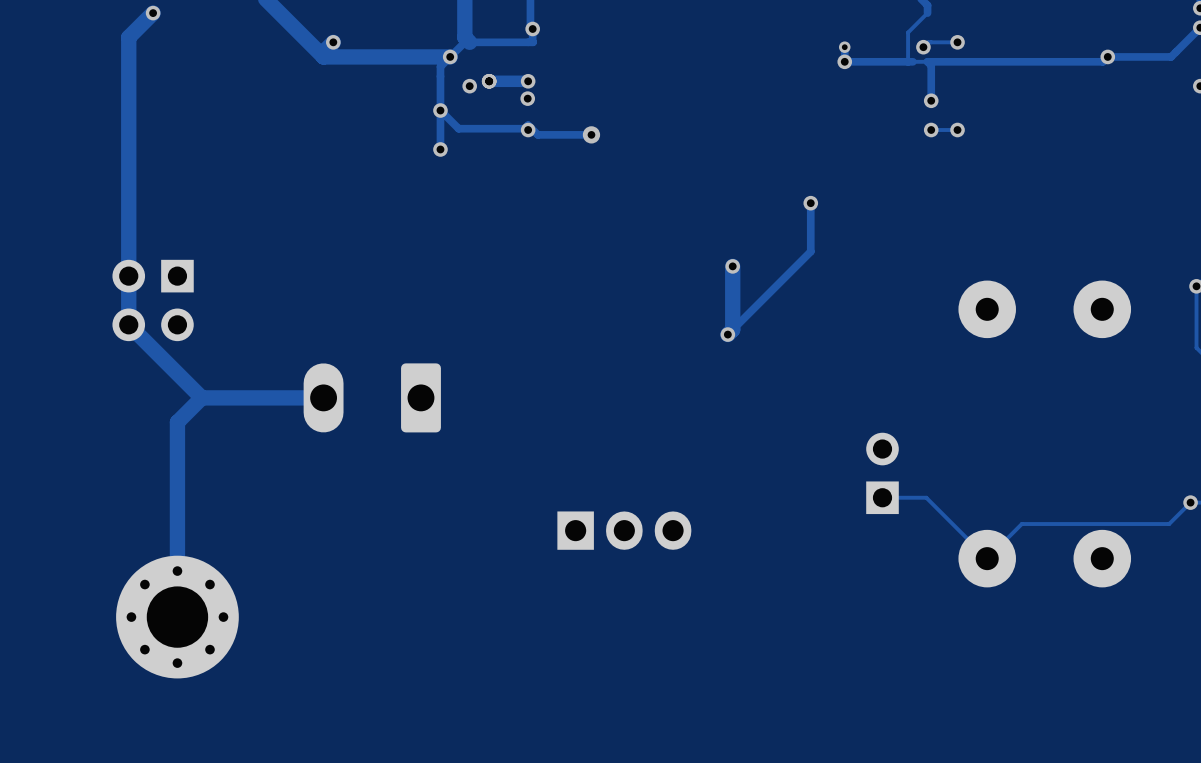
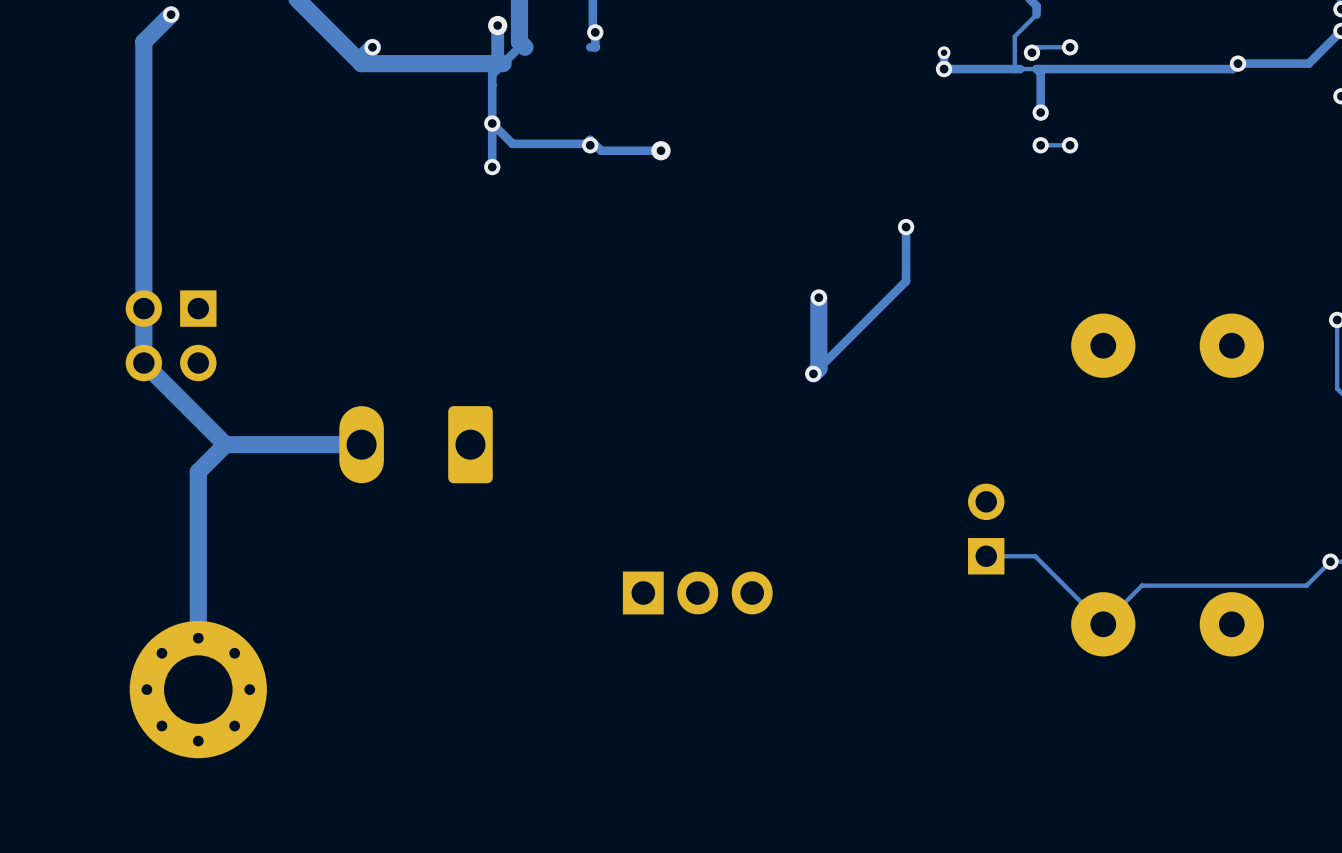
track: none -> (497, 25) (497, 58) (503, 63)
via: none -> (497, 25)
track: (528, 42) (469, 42) -> none
via: (450, 56) -> none
via: (489, 81) -> none
track: (528, 81) (489, 81) -> none
via: (528, 81) -> none
via: (469, 86) -> none
via: (527, 98) -> none

